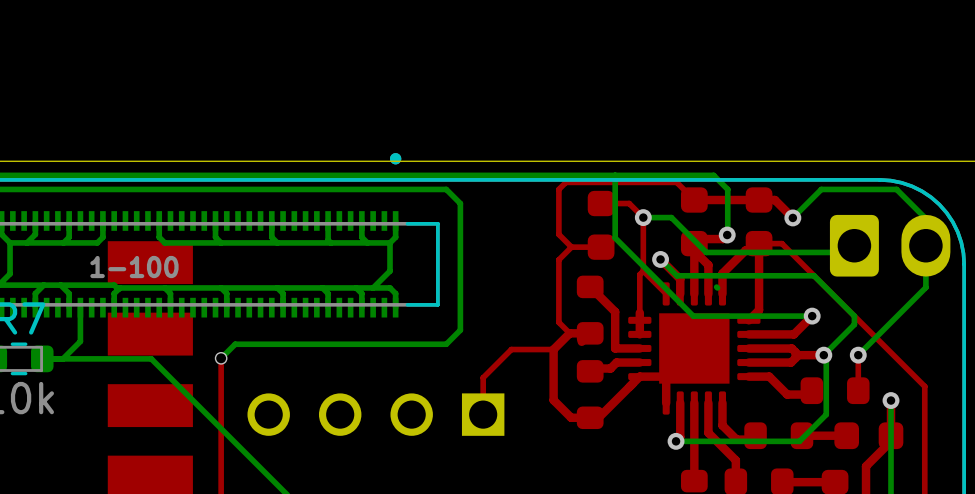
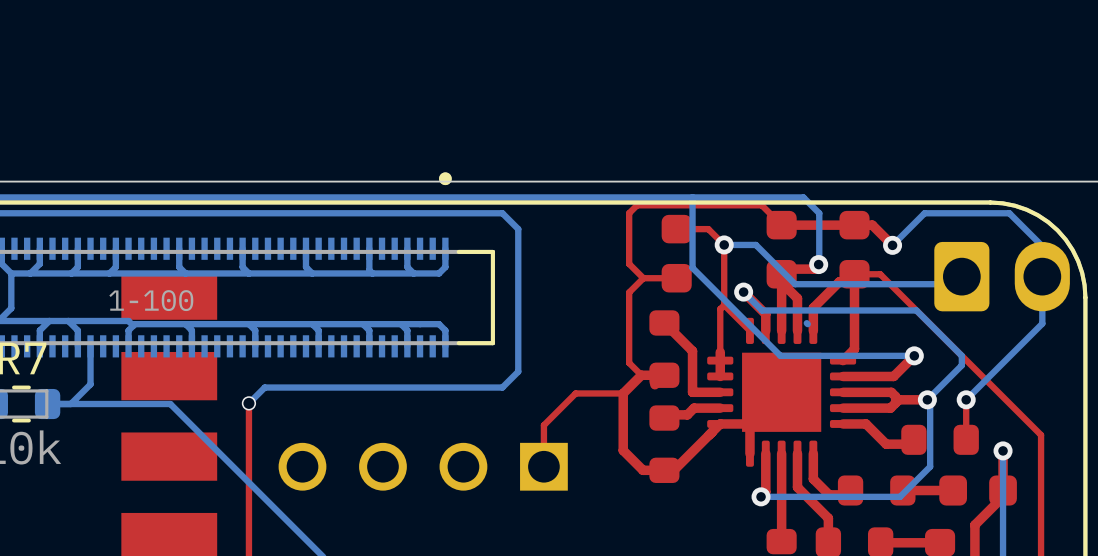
bottom track: none -> (185, 273) (109, 273)
bottom track: (390, 242) (390, 271) (373, 287) -> none

